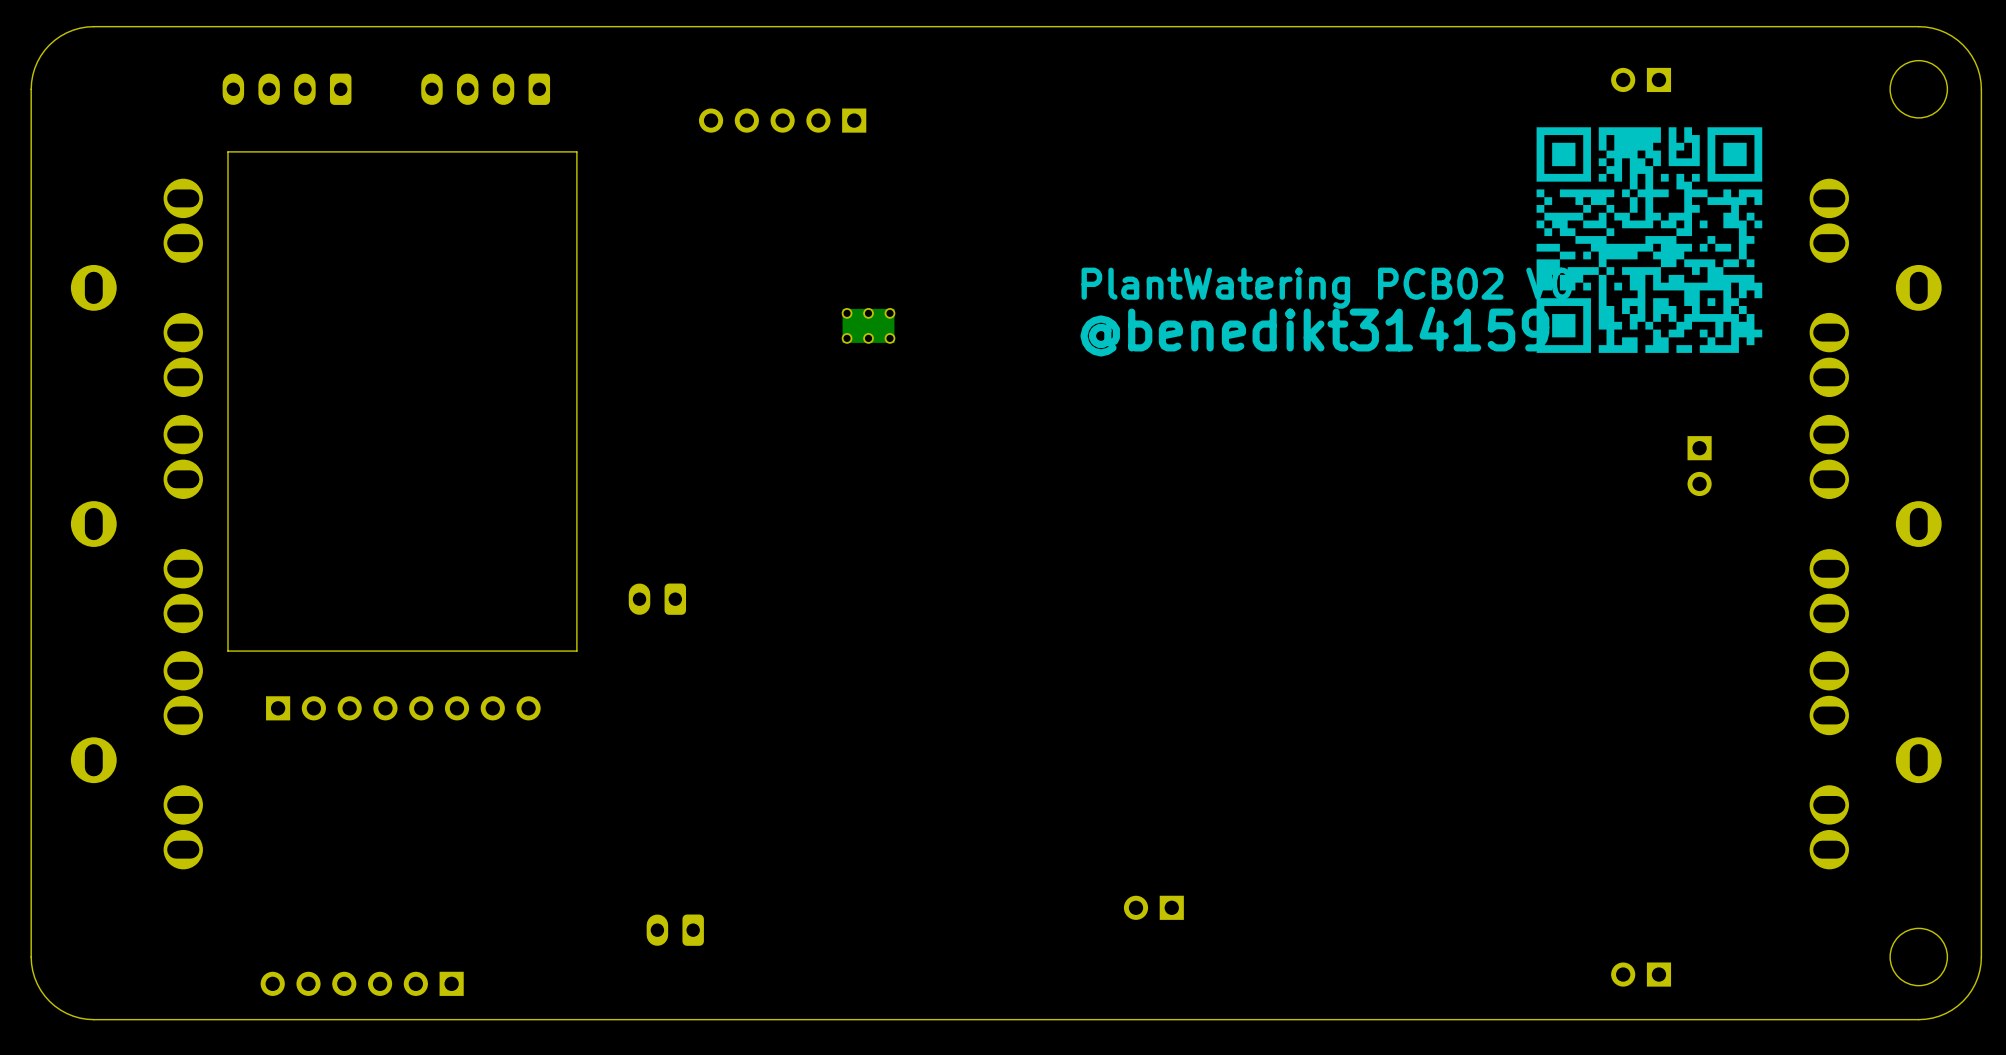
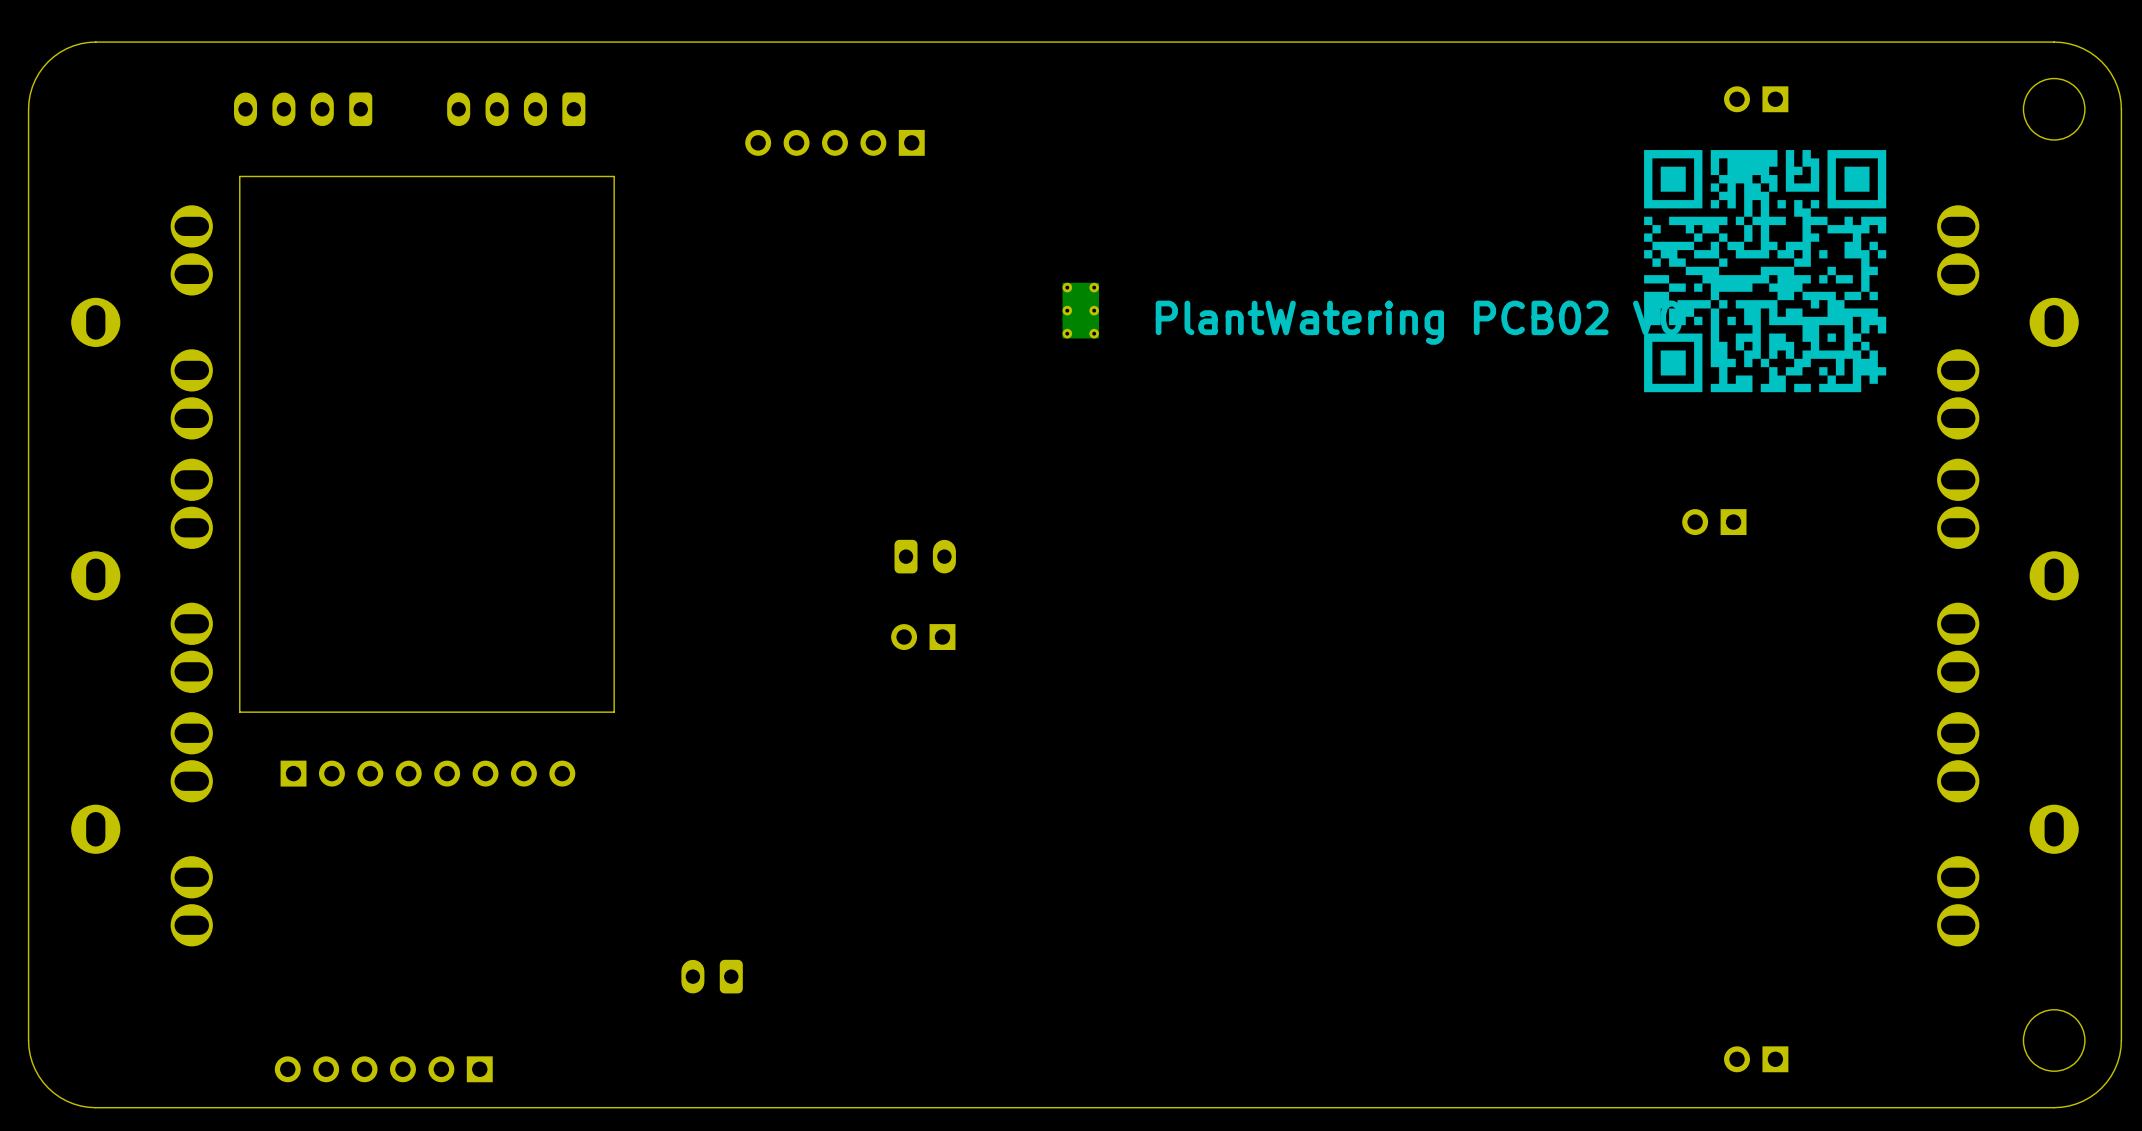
part: none -> (1080, 310)
part: (868, 325) -> none
text: @benedikt314159 (1314, 331) -> none
part rotation: 0° (1699, 466) -> 90° clockwise (1714, 522)
part position: (1699, 466) -> (1714, 522)
part: none -> (925, 556)
part: none -> (923, 637)
part: (657, 599) -> none
part: (1153, 907) -> none
part position: (675, 930) -> (712, 976)

